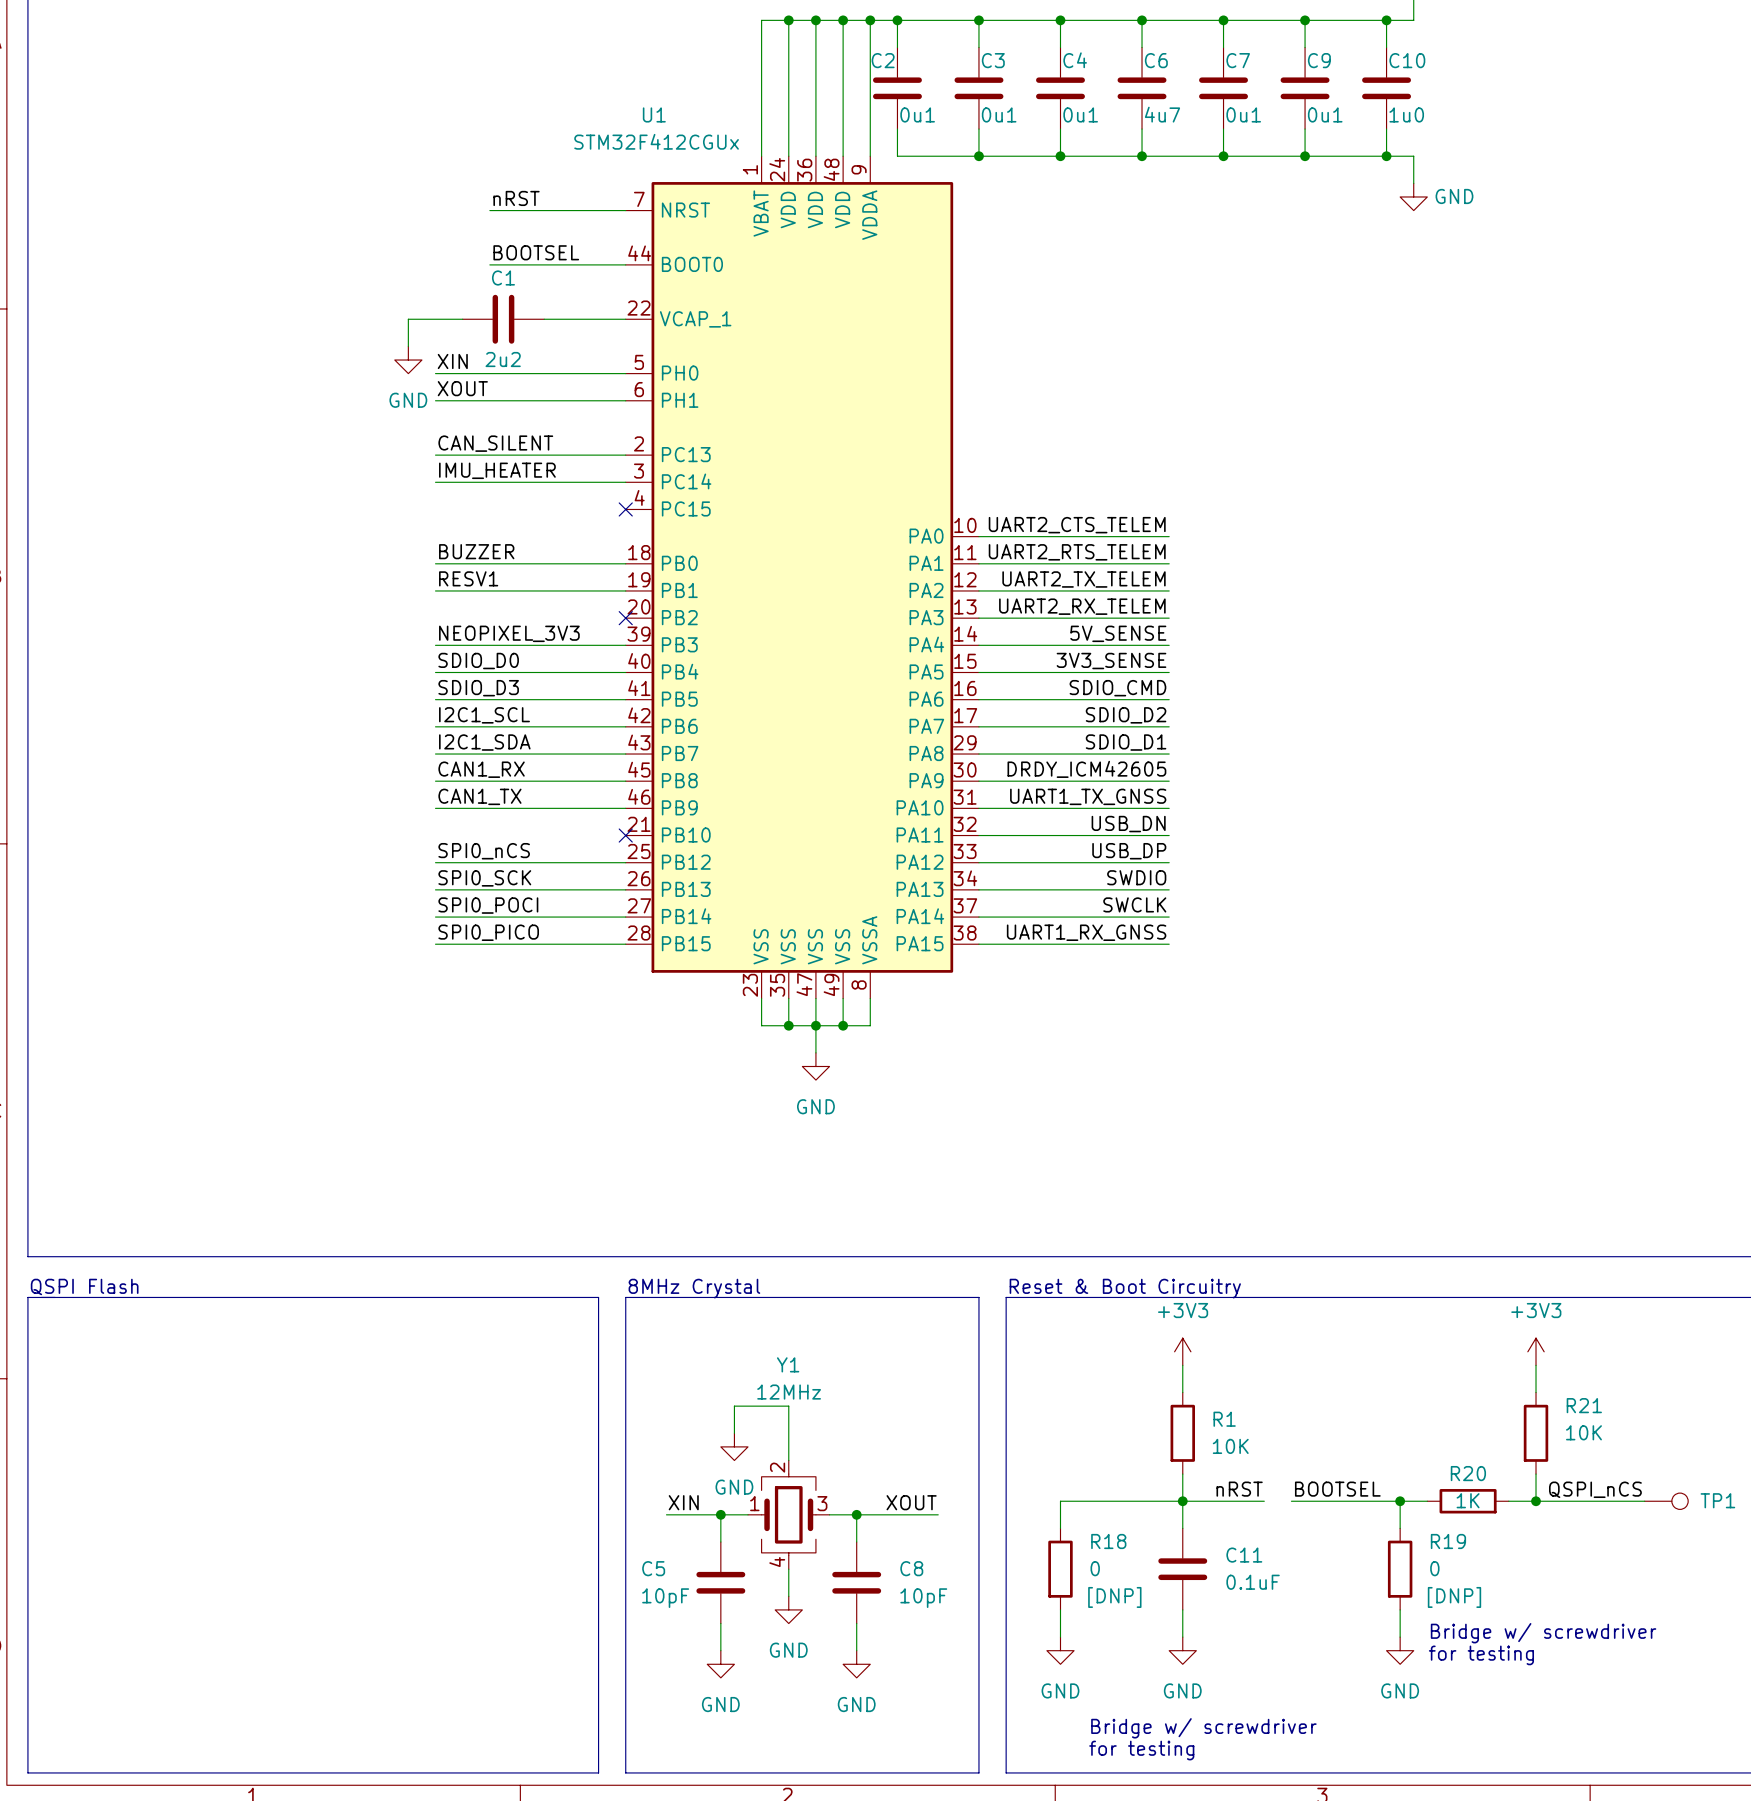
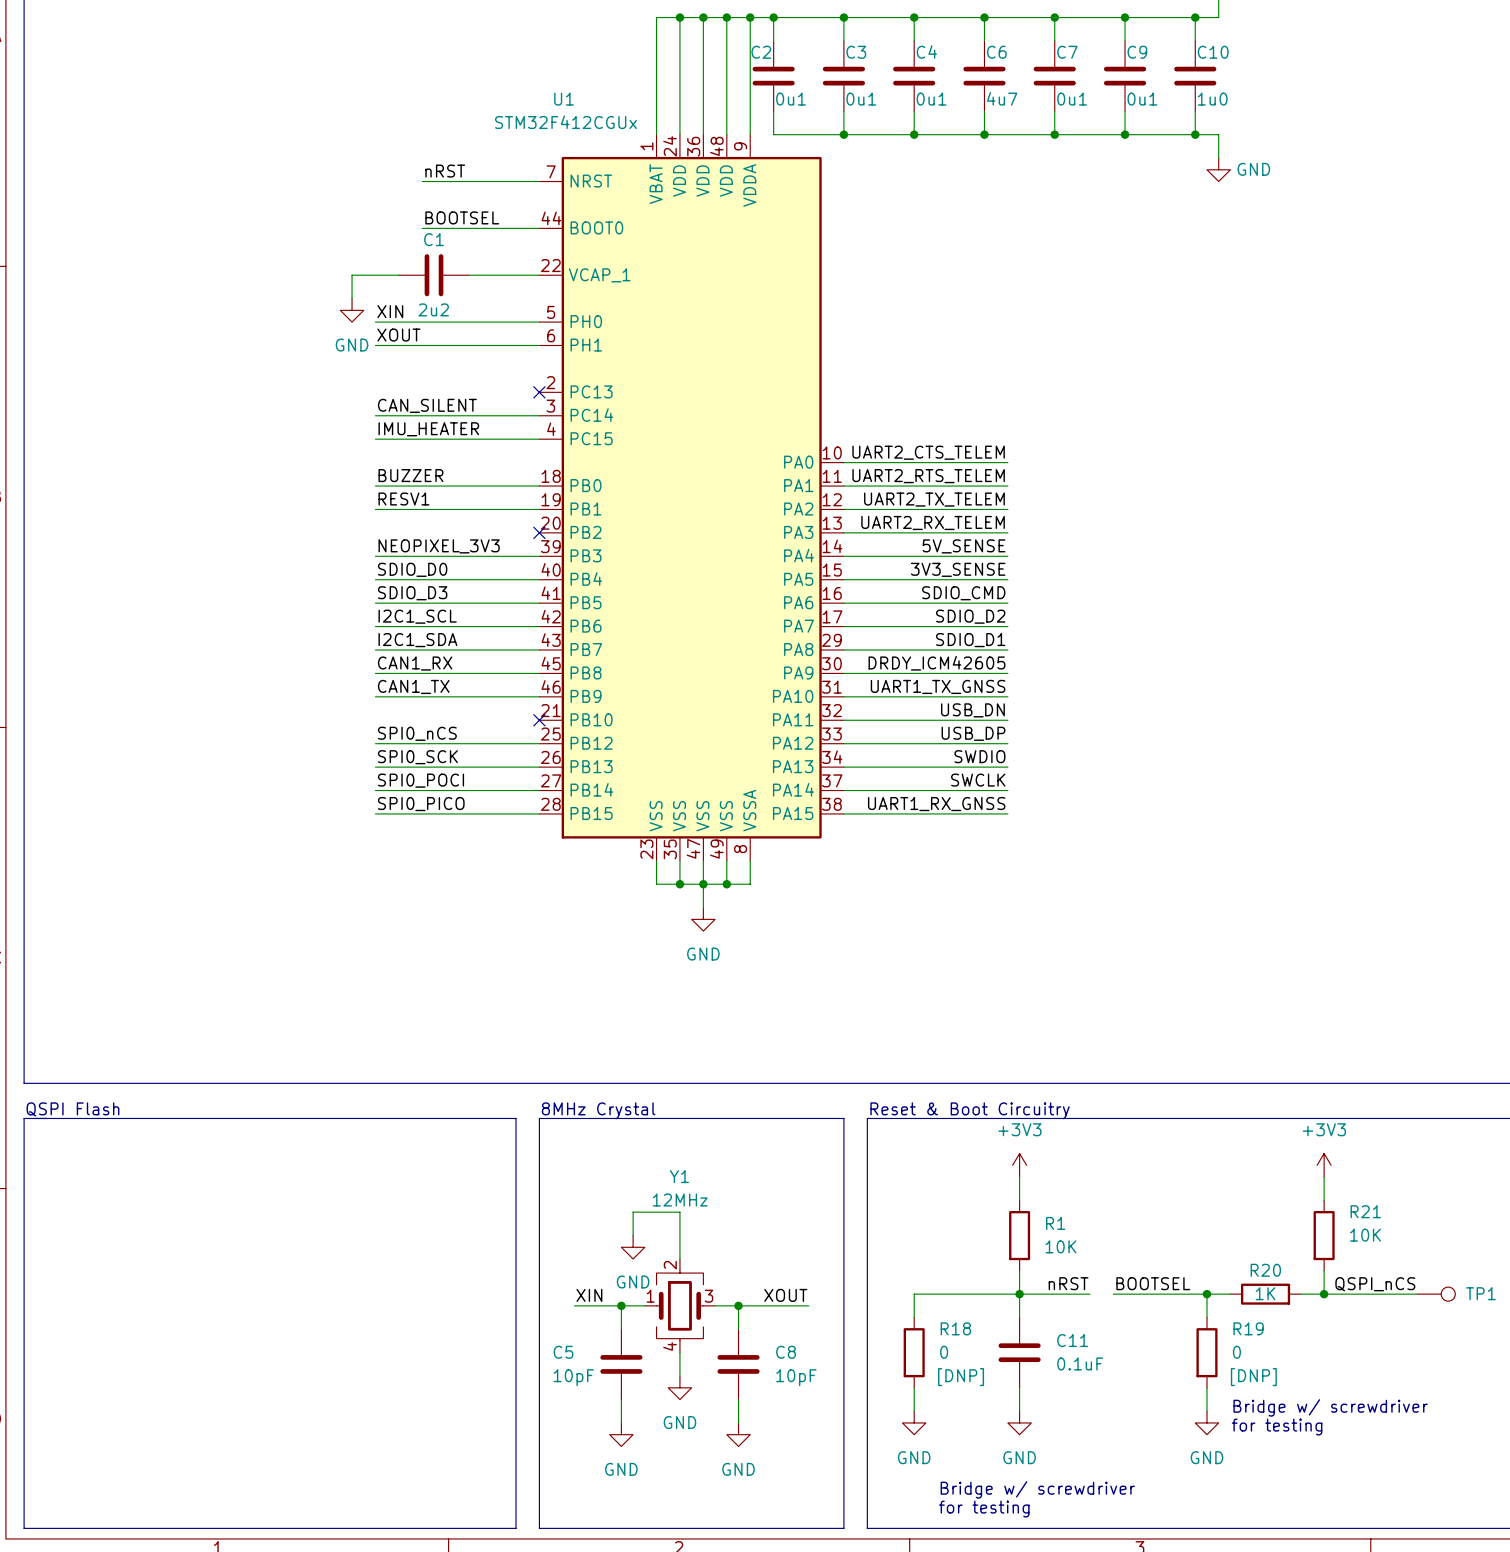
label: CAN_SILENT (495, 443) -> none
wire: (435, 455) (625, 455) -> (375, 439) (539, 439)
label: IMU_HEATER (497, 470) -> CAN_SILENT (427, 405)
label: none -> IMU_HEATER (428, 429)
no-connect mark position: (625, 509) -> (539, 392)

